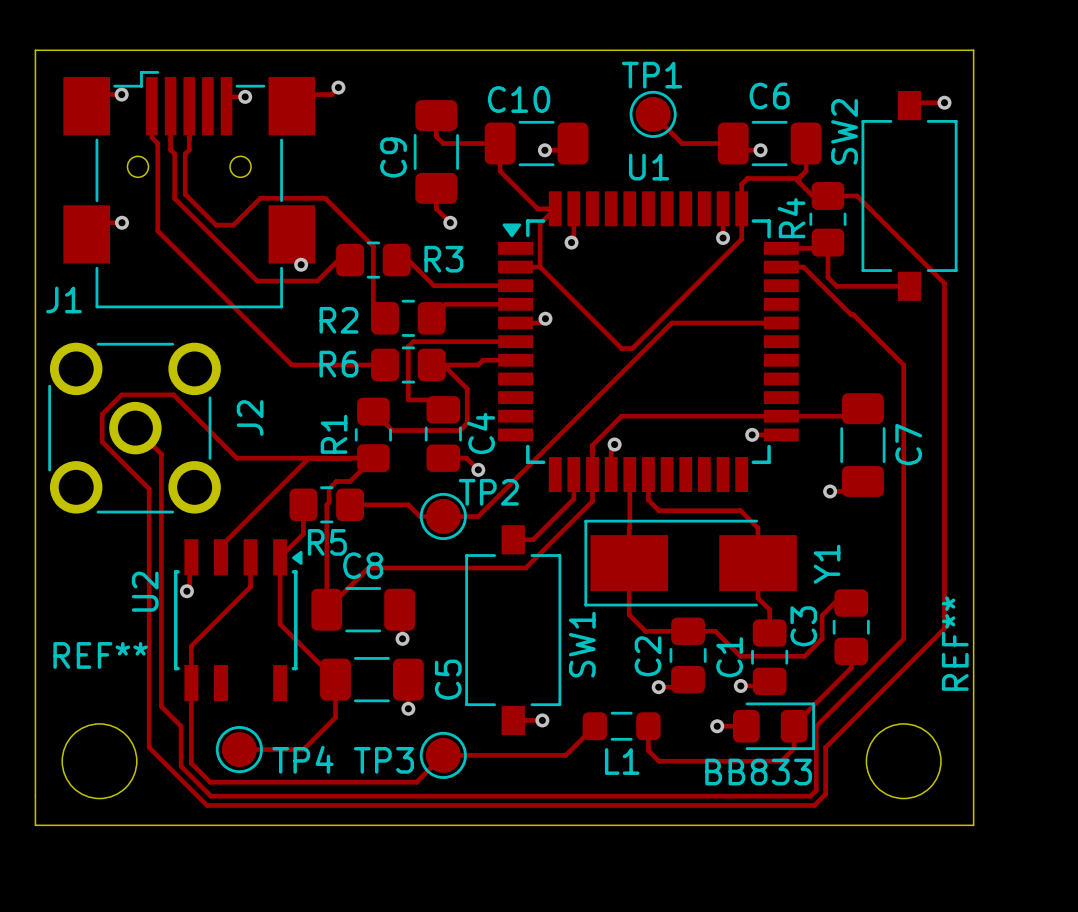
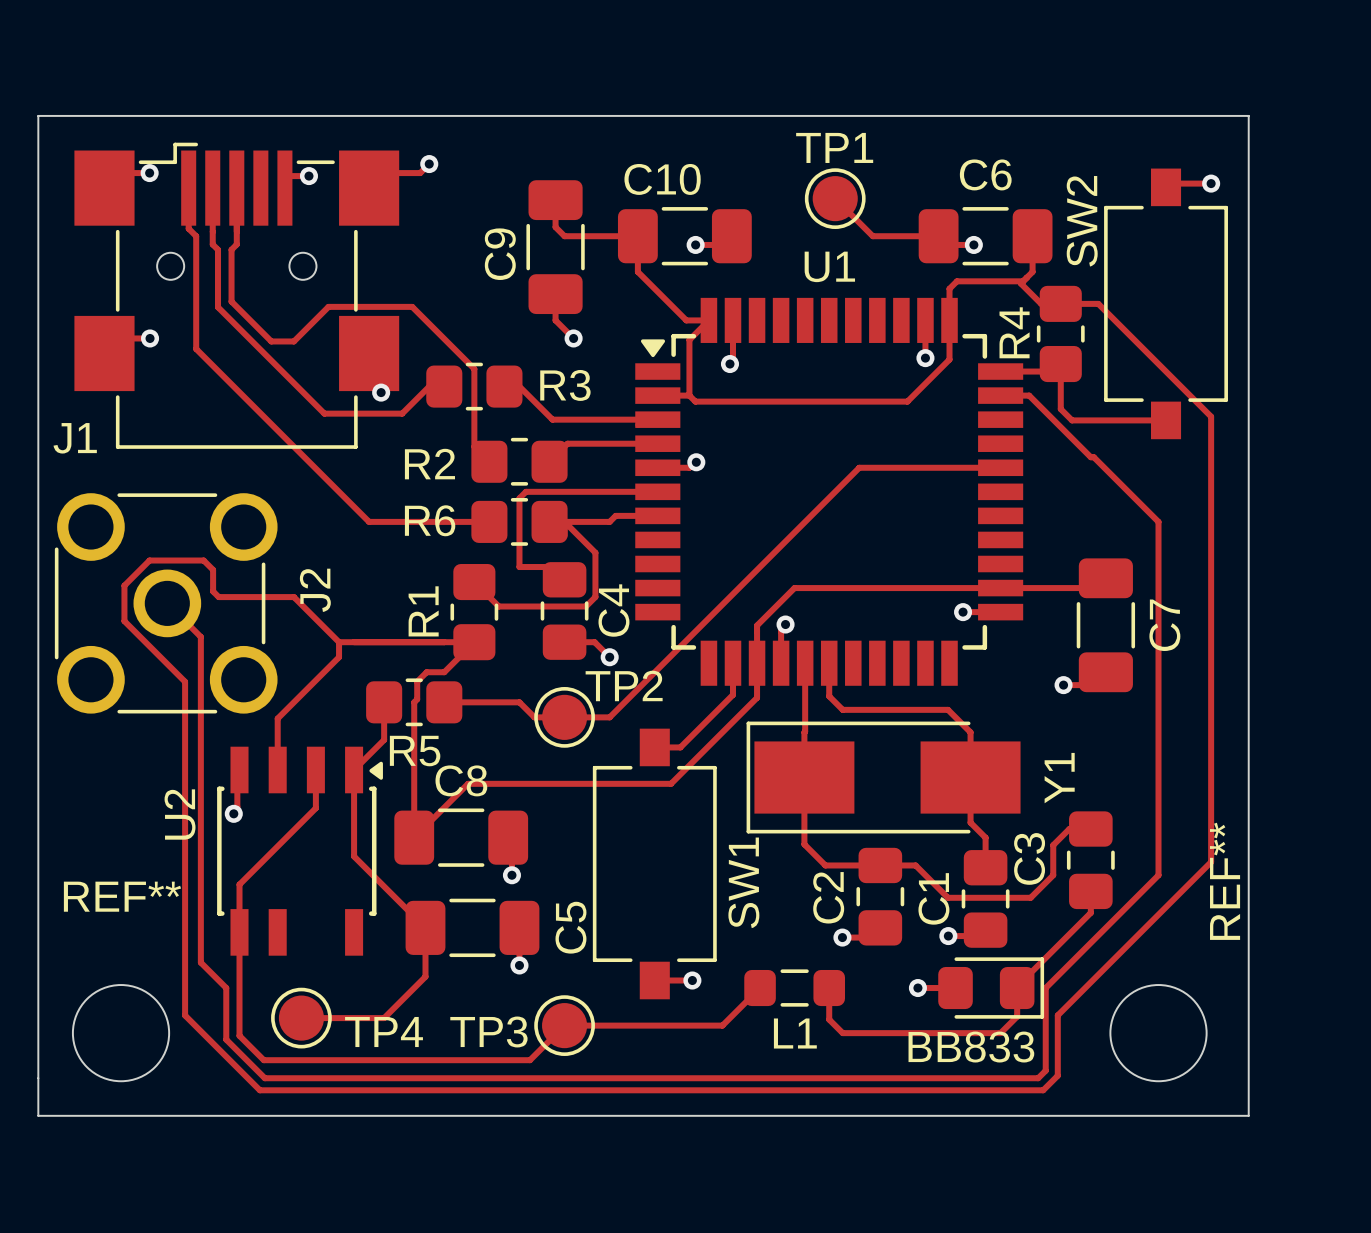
track: (544, 271) (621, 348) (632, 348) (709, 271) -> (695, 401) (907, 401)
track: (163, 394) (173, 394) (236, 458) (268, 458) -> (203, 560) (213, 569) (213, 591) (218, 597) (293, 597) (339, 642) (339, 657) (277, 718) (277, 755)
track: (308, 458) (220, 546) -> none

